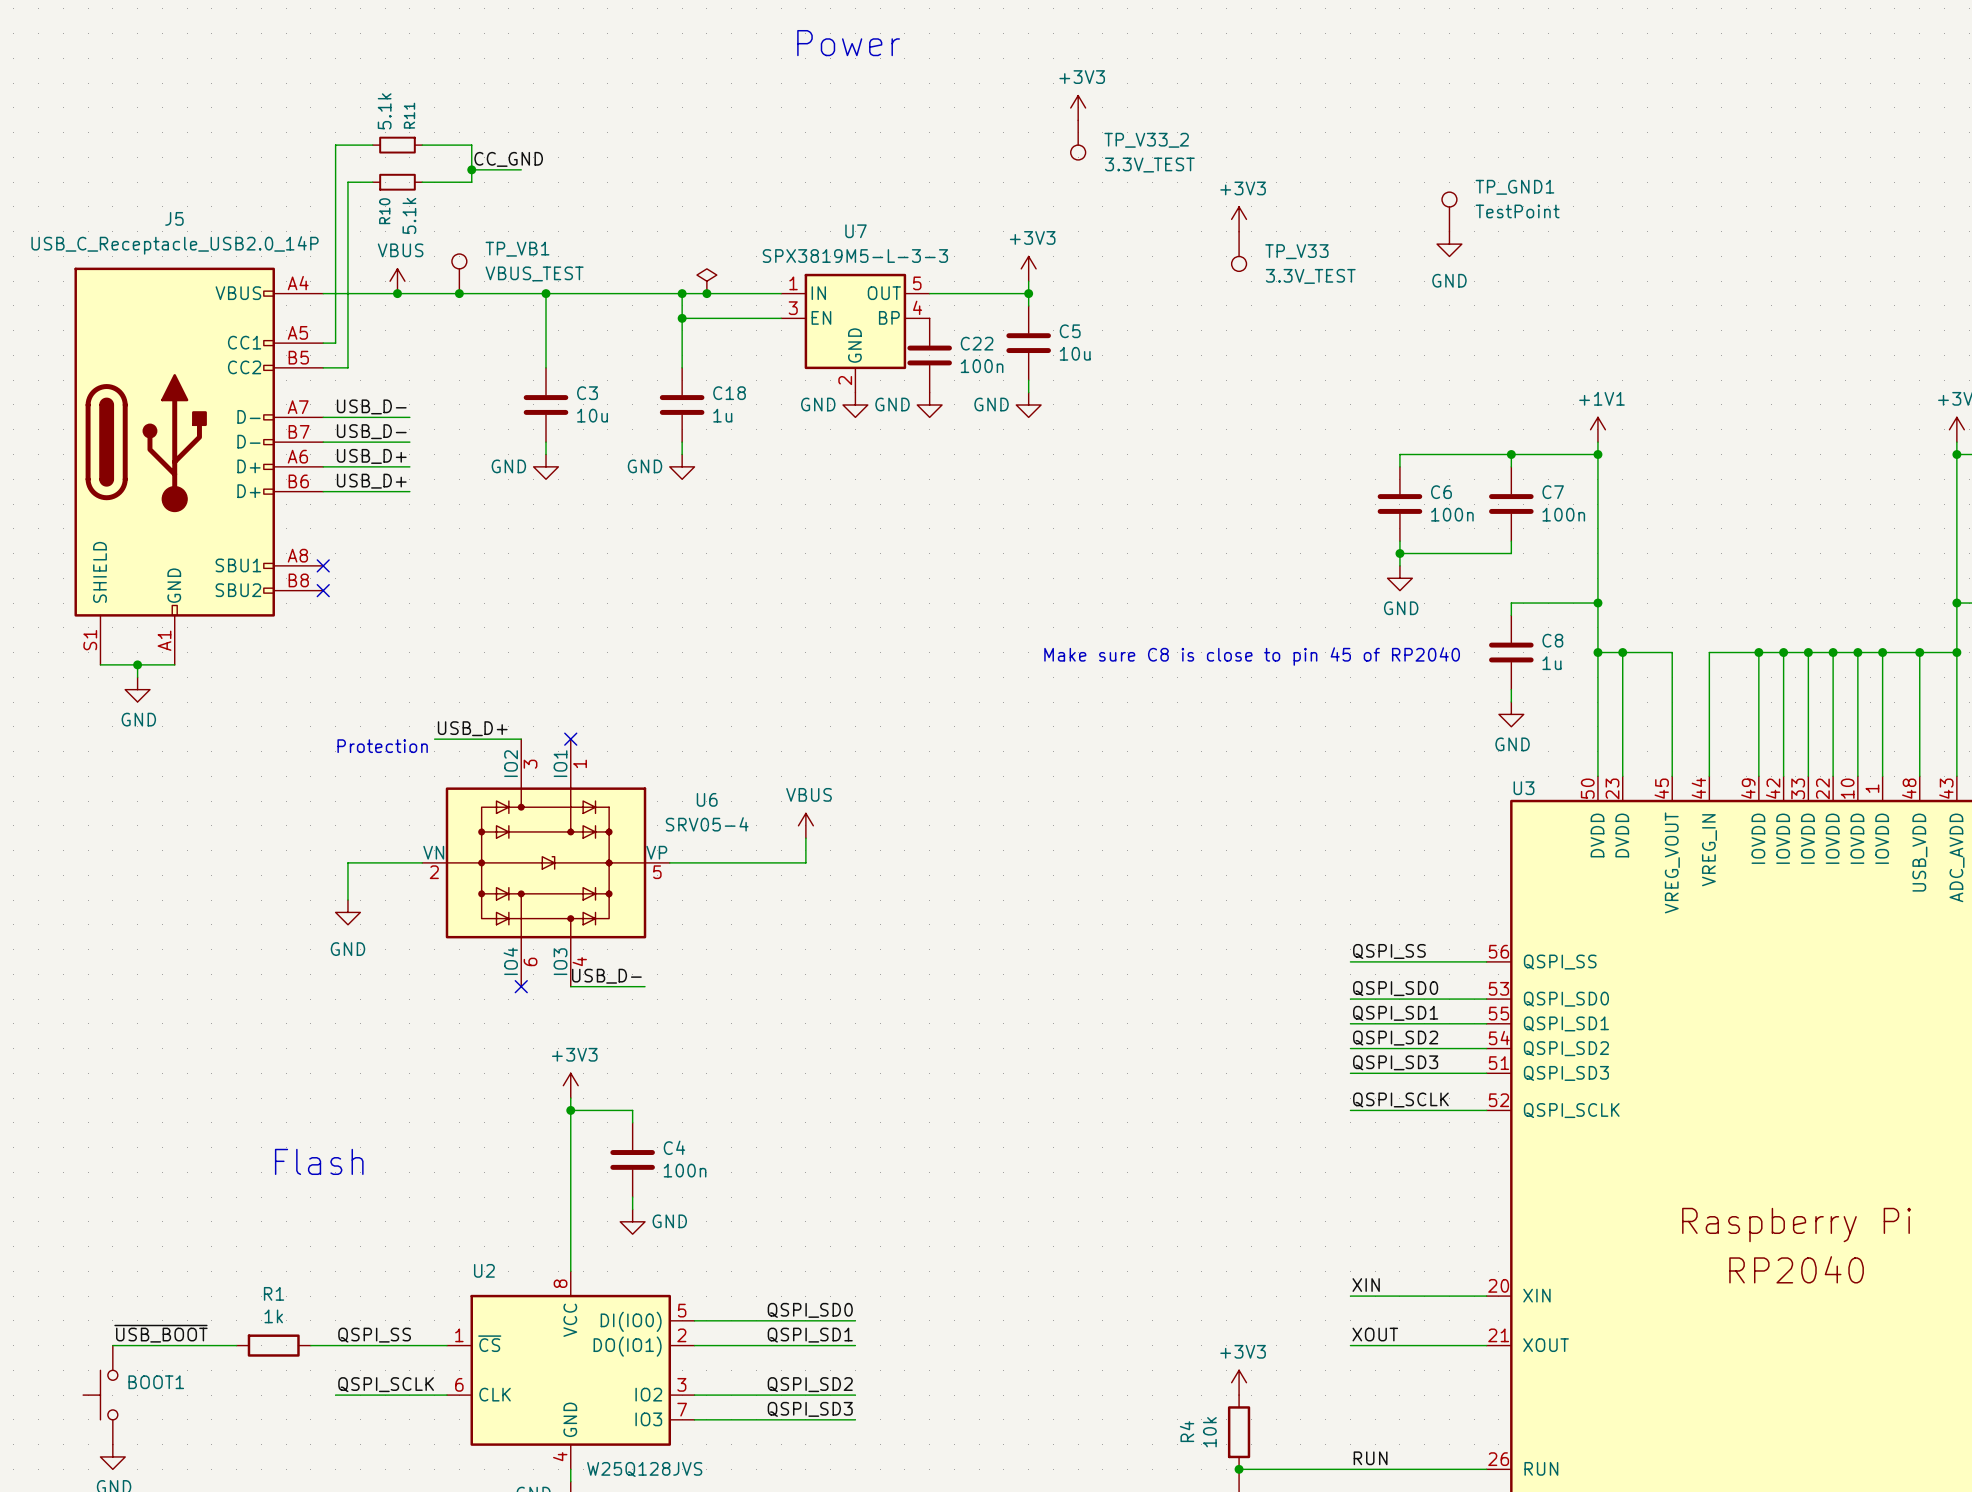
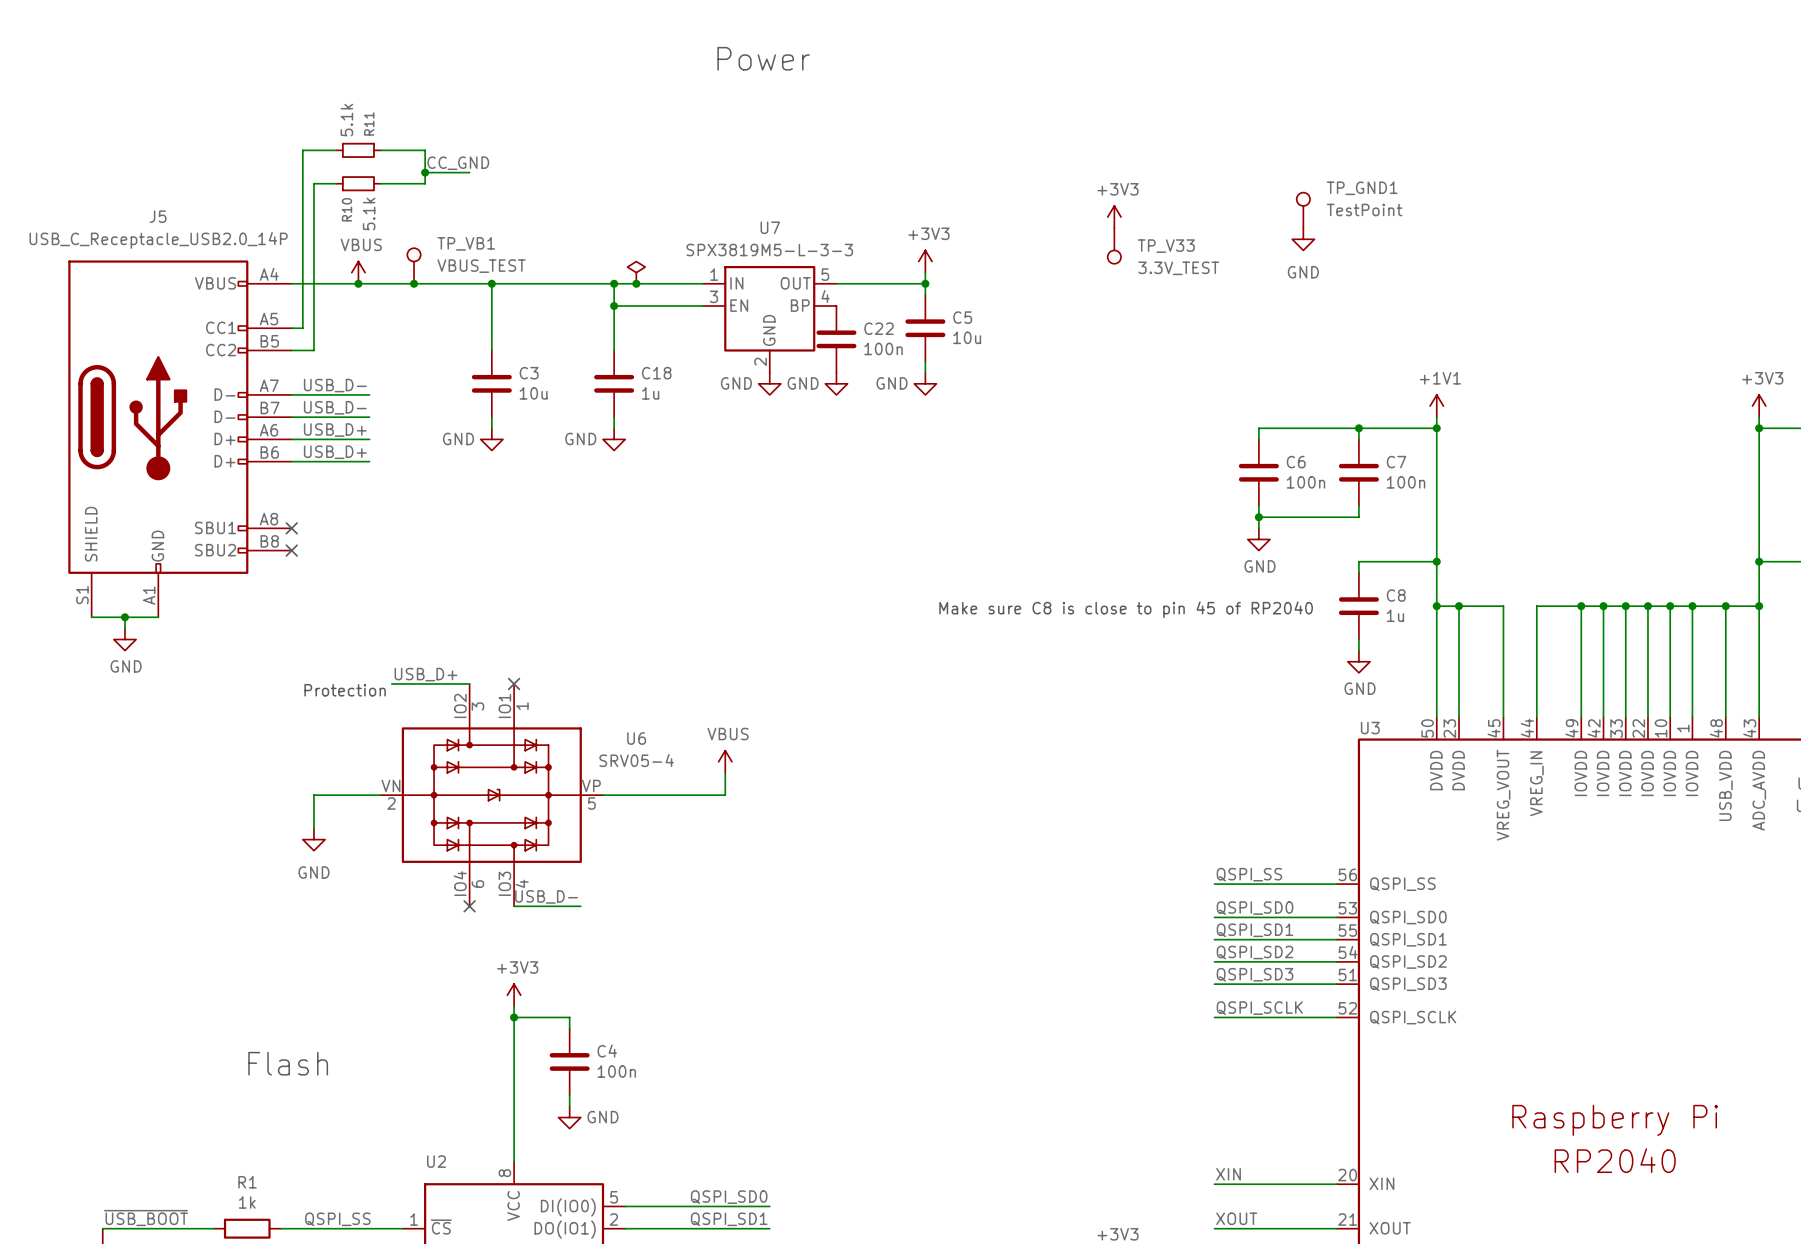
power symbol: +3V3 (1078, 107) -> none
TP_V33_2: 3.3V_TEST (1078, 140) -> none

